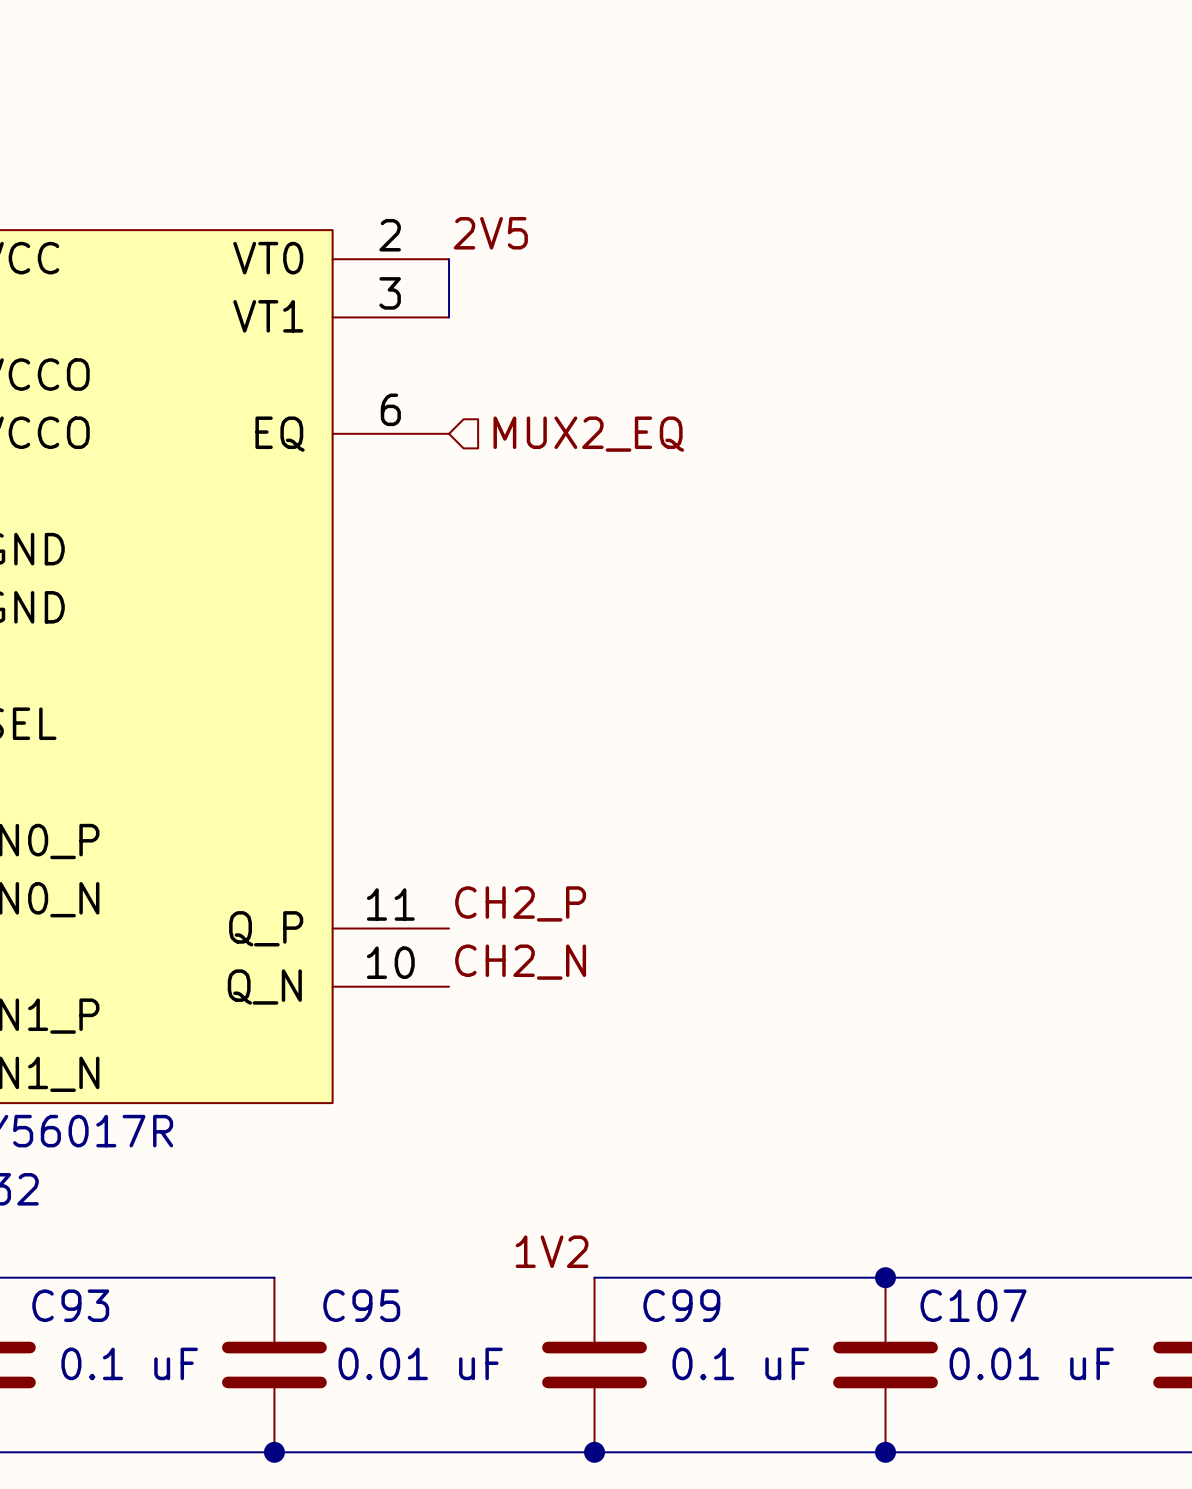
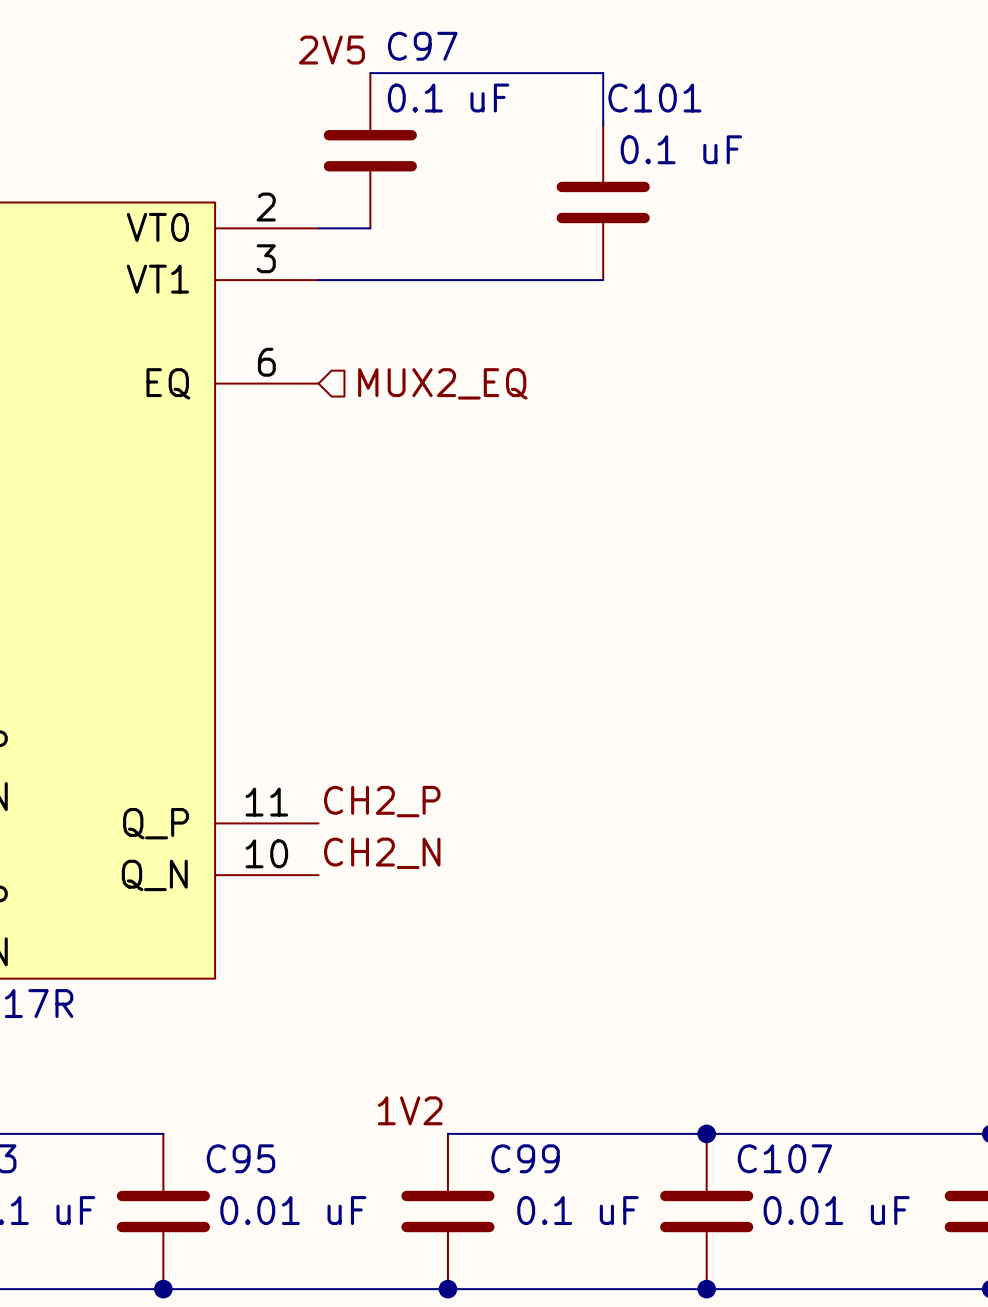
wire: none -> (370, 73) (603, 73) (603, 124)
C97: none -> 0.1 uF (370, 150)
C101: none -> 0.1 uF (603, 202)
label position: 2V5 (490, 233) -> 2V5 (331, 50)
wire: (449, 259) (449, 317) -> (318, 228) (370, 228)
wire: none -> (318, 280) (603, 280)

